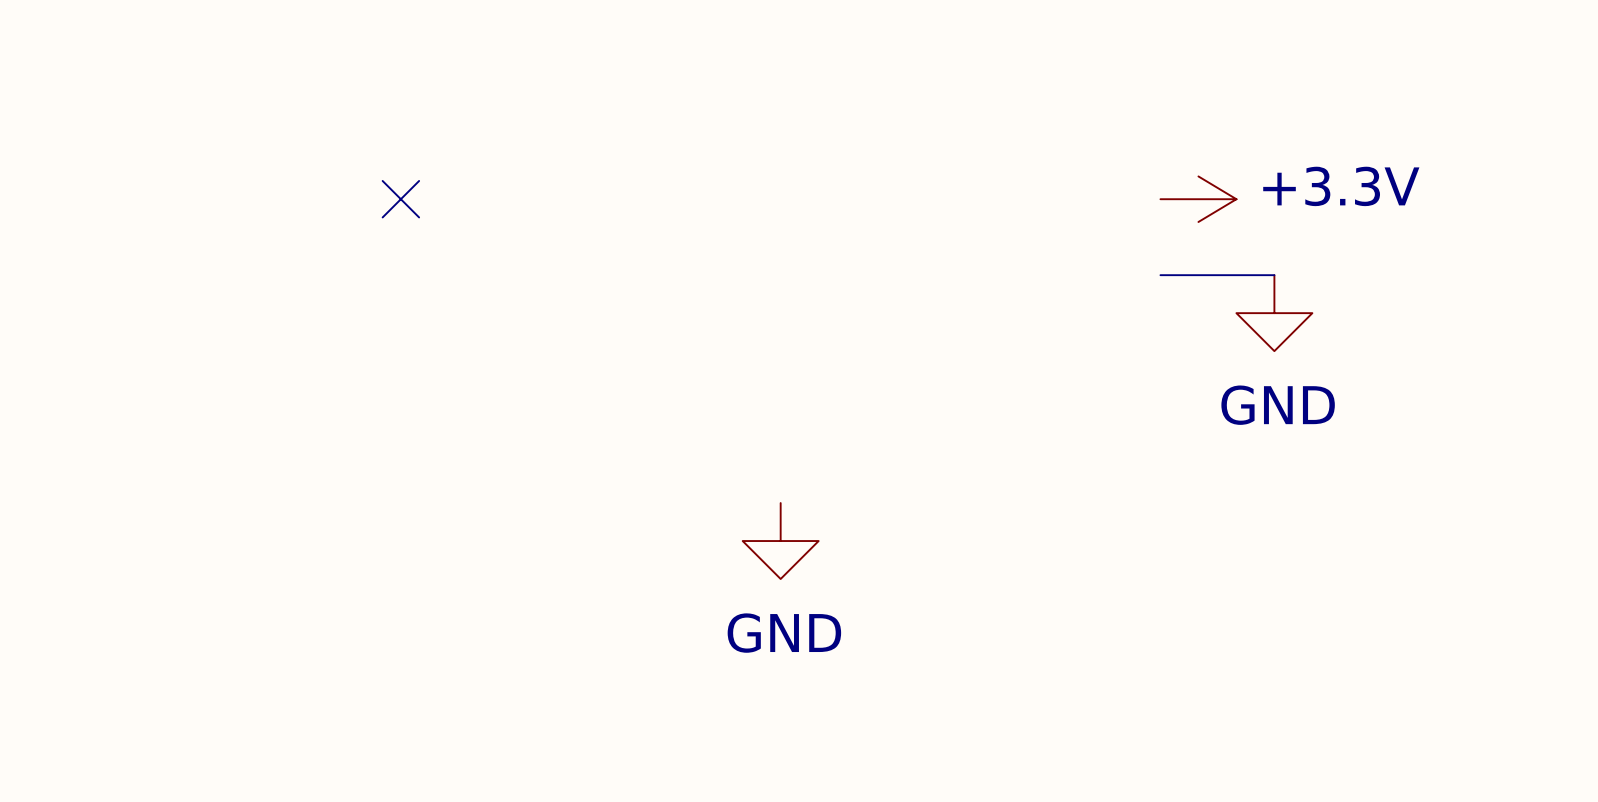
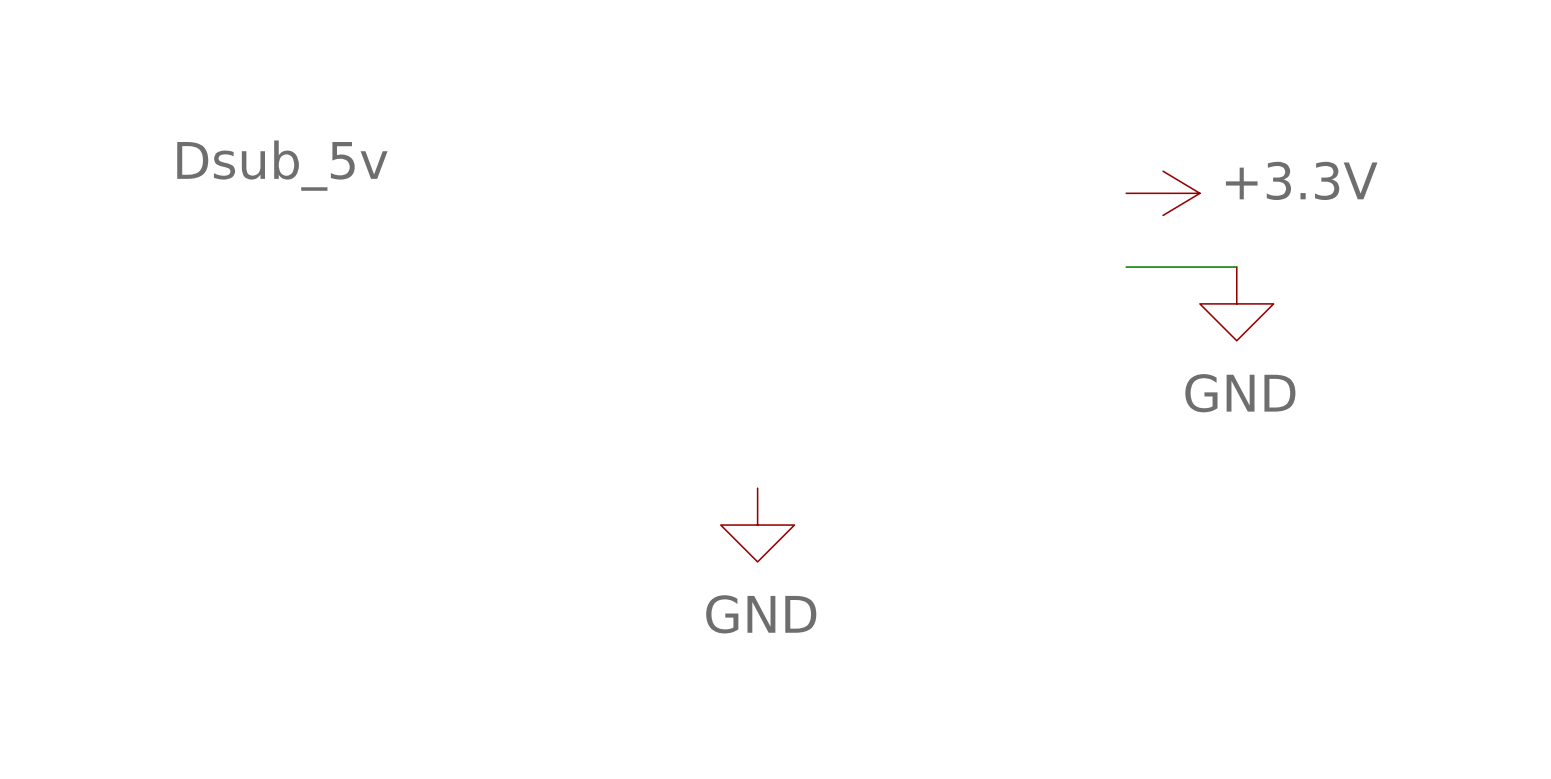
label: none -> Dsub_5v (282, 165)
no-connect mark: (400, 199) -> none

